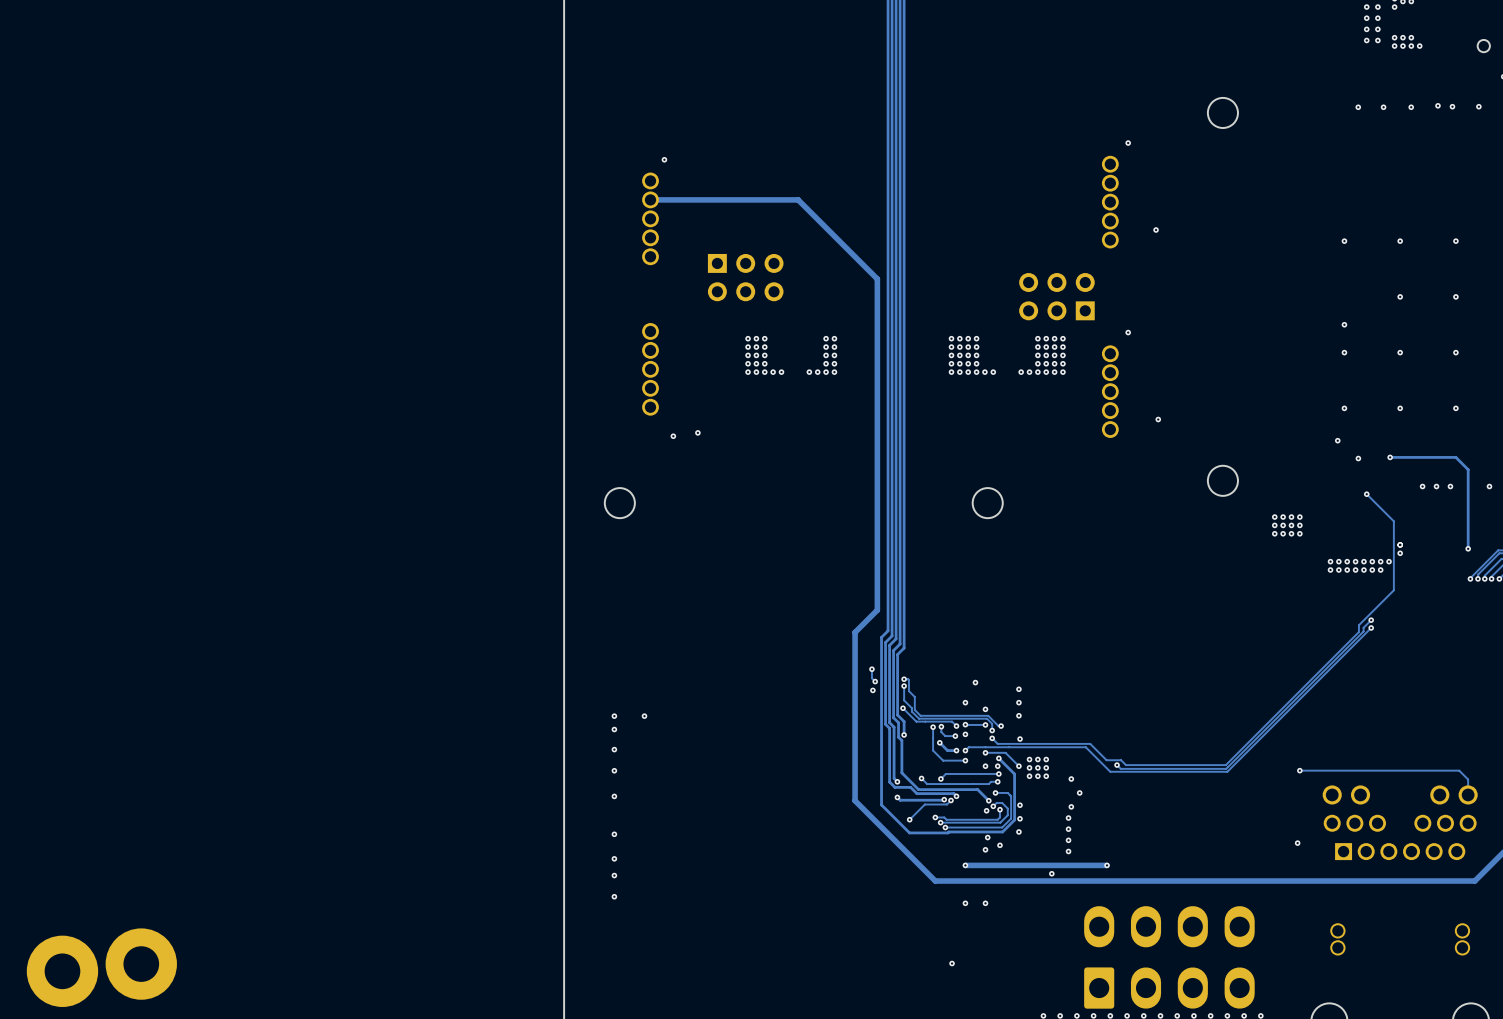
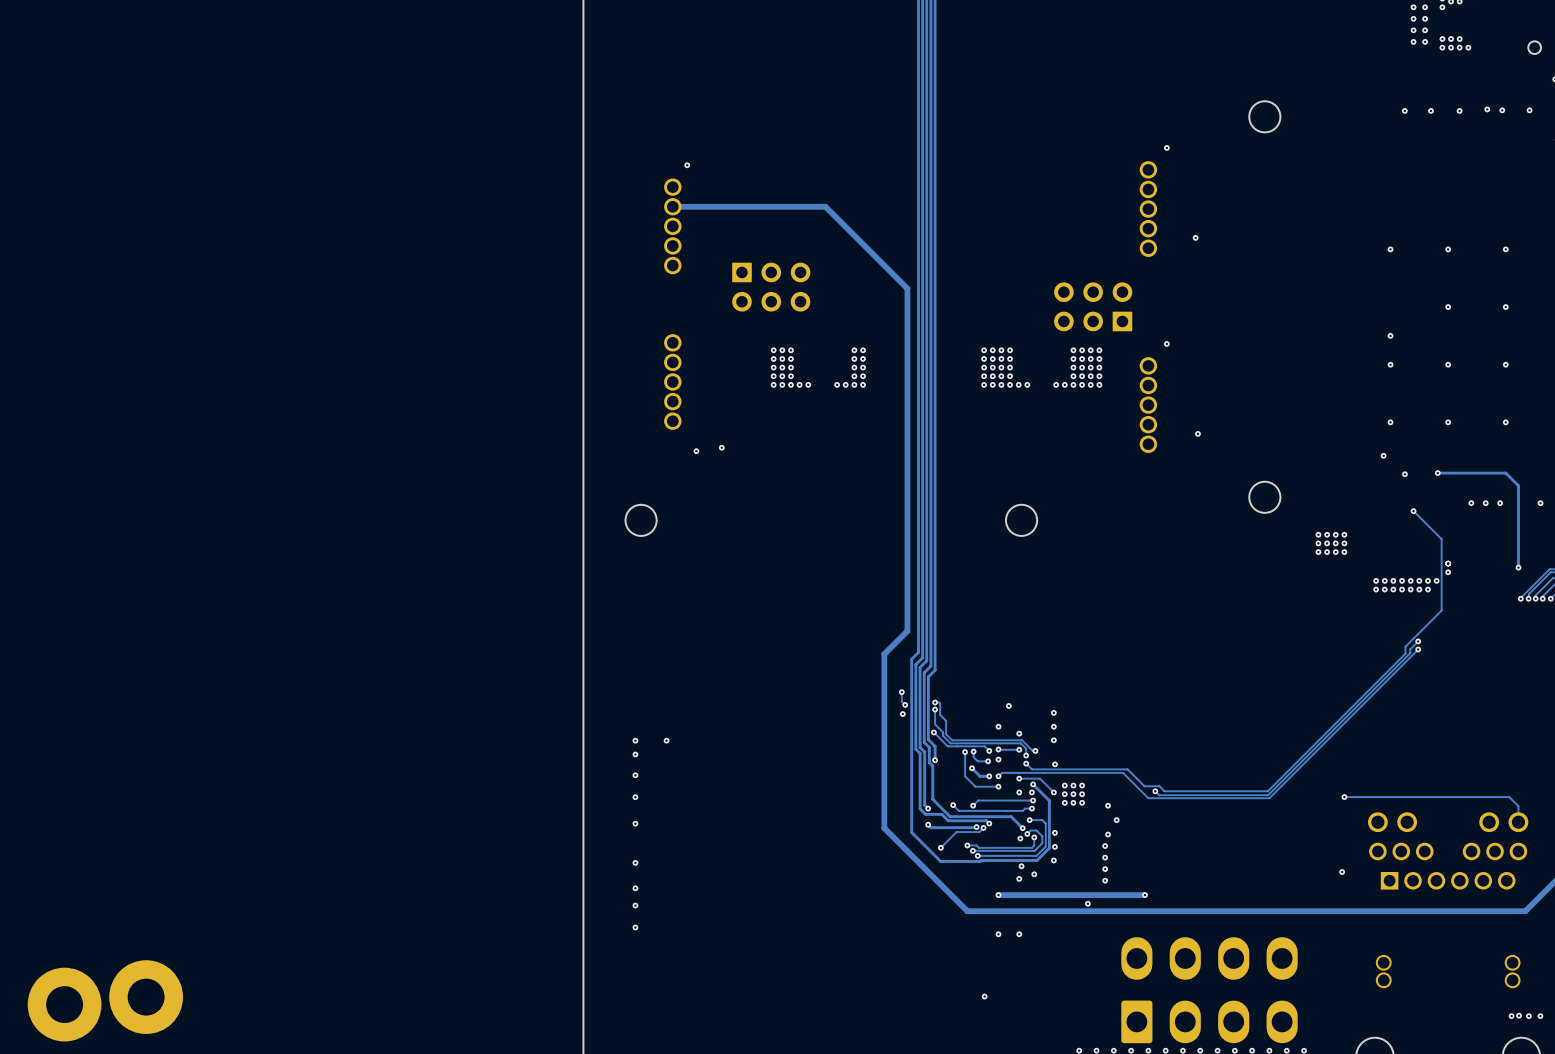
via: none -> (1511, 1016)
via: none -> (1519, 1015)
via: none -> (1528, 1016)
via: none -> (1540, 1016)

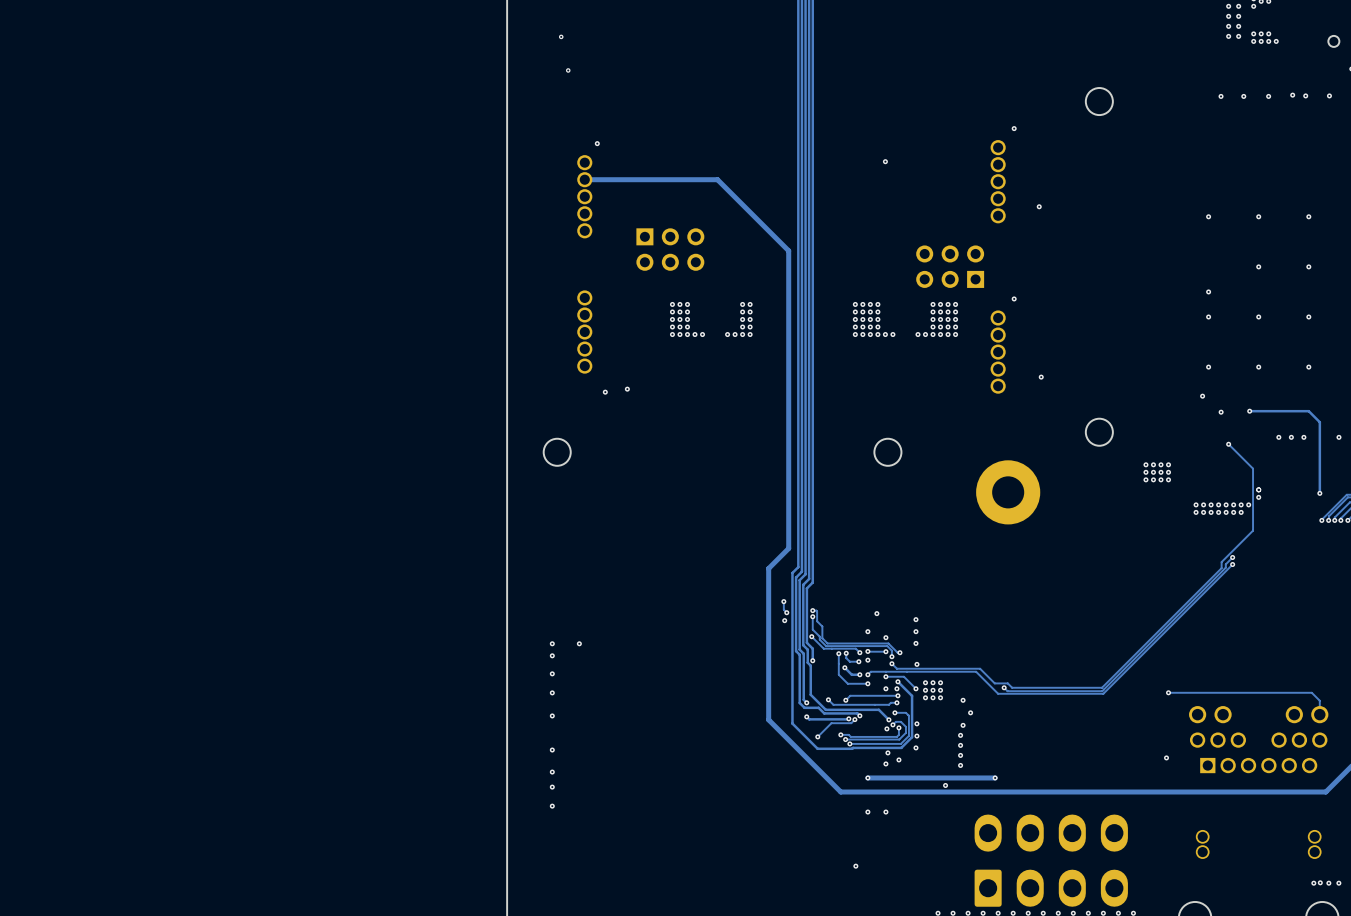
via: none -> (561, 36)
via: none -> (568, 70)
via: none -> (885, 161)
part: none -> (1008, 492)
part: (146, 997) -> none
part: (64, 1004) -> none

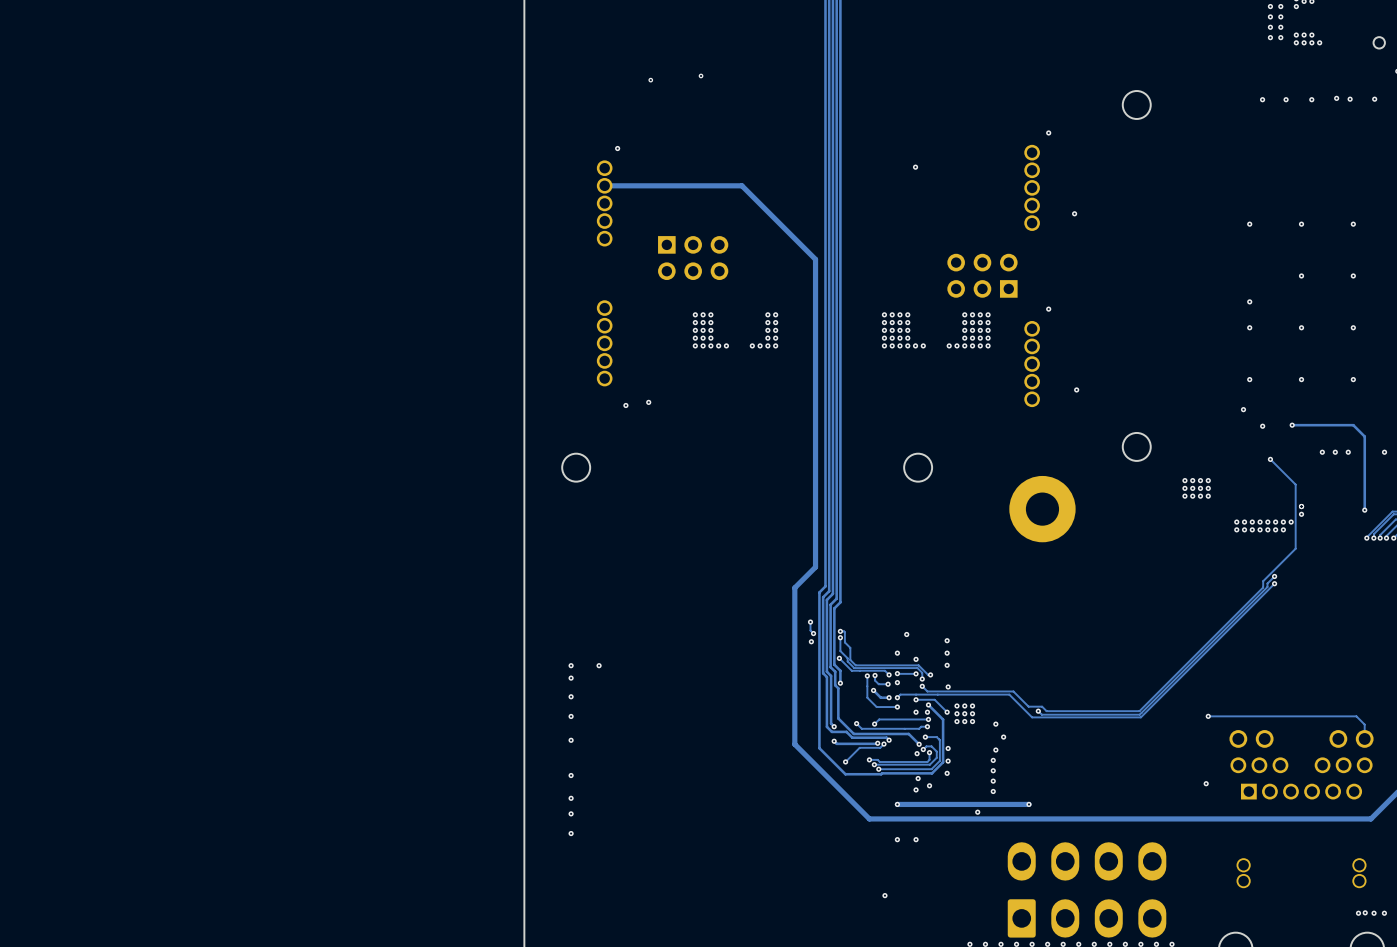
via: (561, 36) -> none
via: (568, 70) -> none
via: none -> (701, 75)
via: none -> (650, 80)

